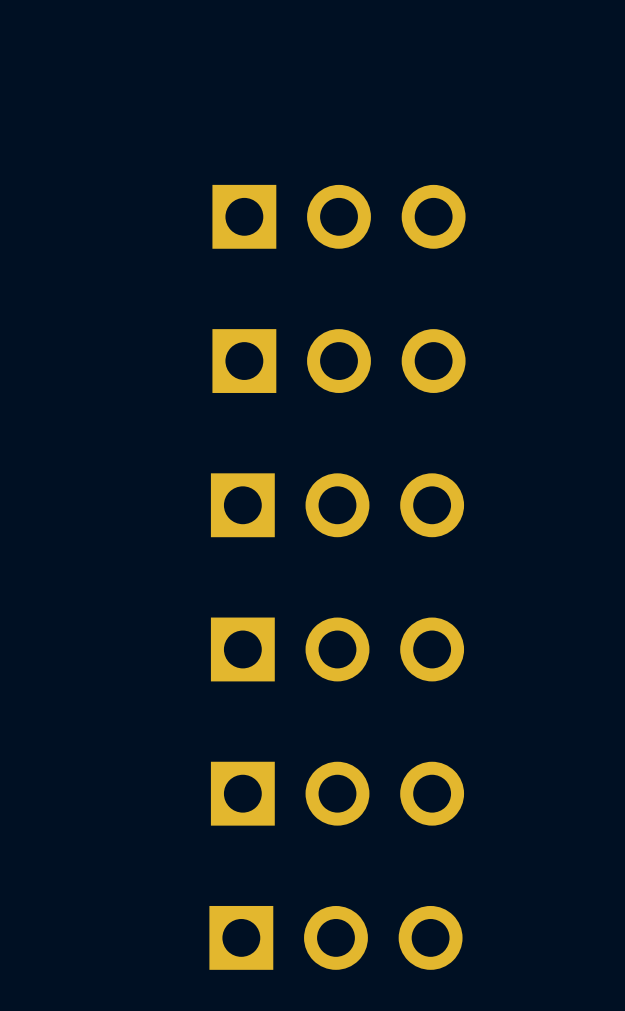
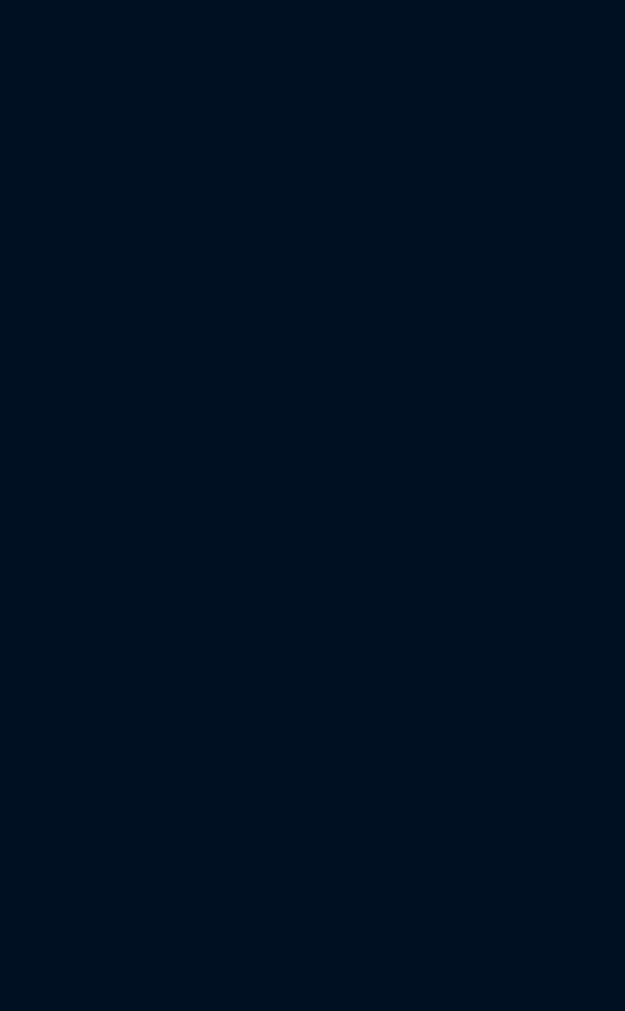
part: (339, 216) -> none
part: (339, 361) -> none
part: (337, 505) -> none
part: (337, 649) -> none
part: (337, 793) -> none
part: (335, 937) -> none

